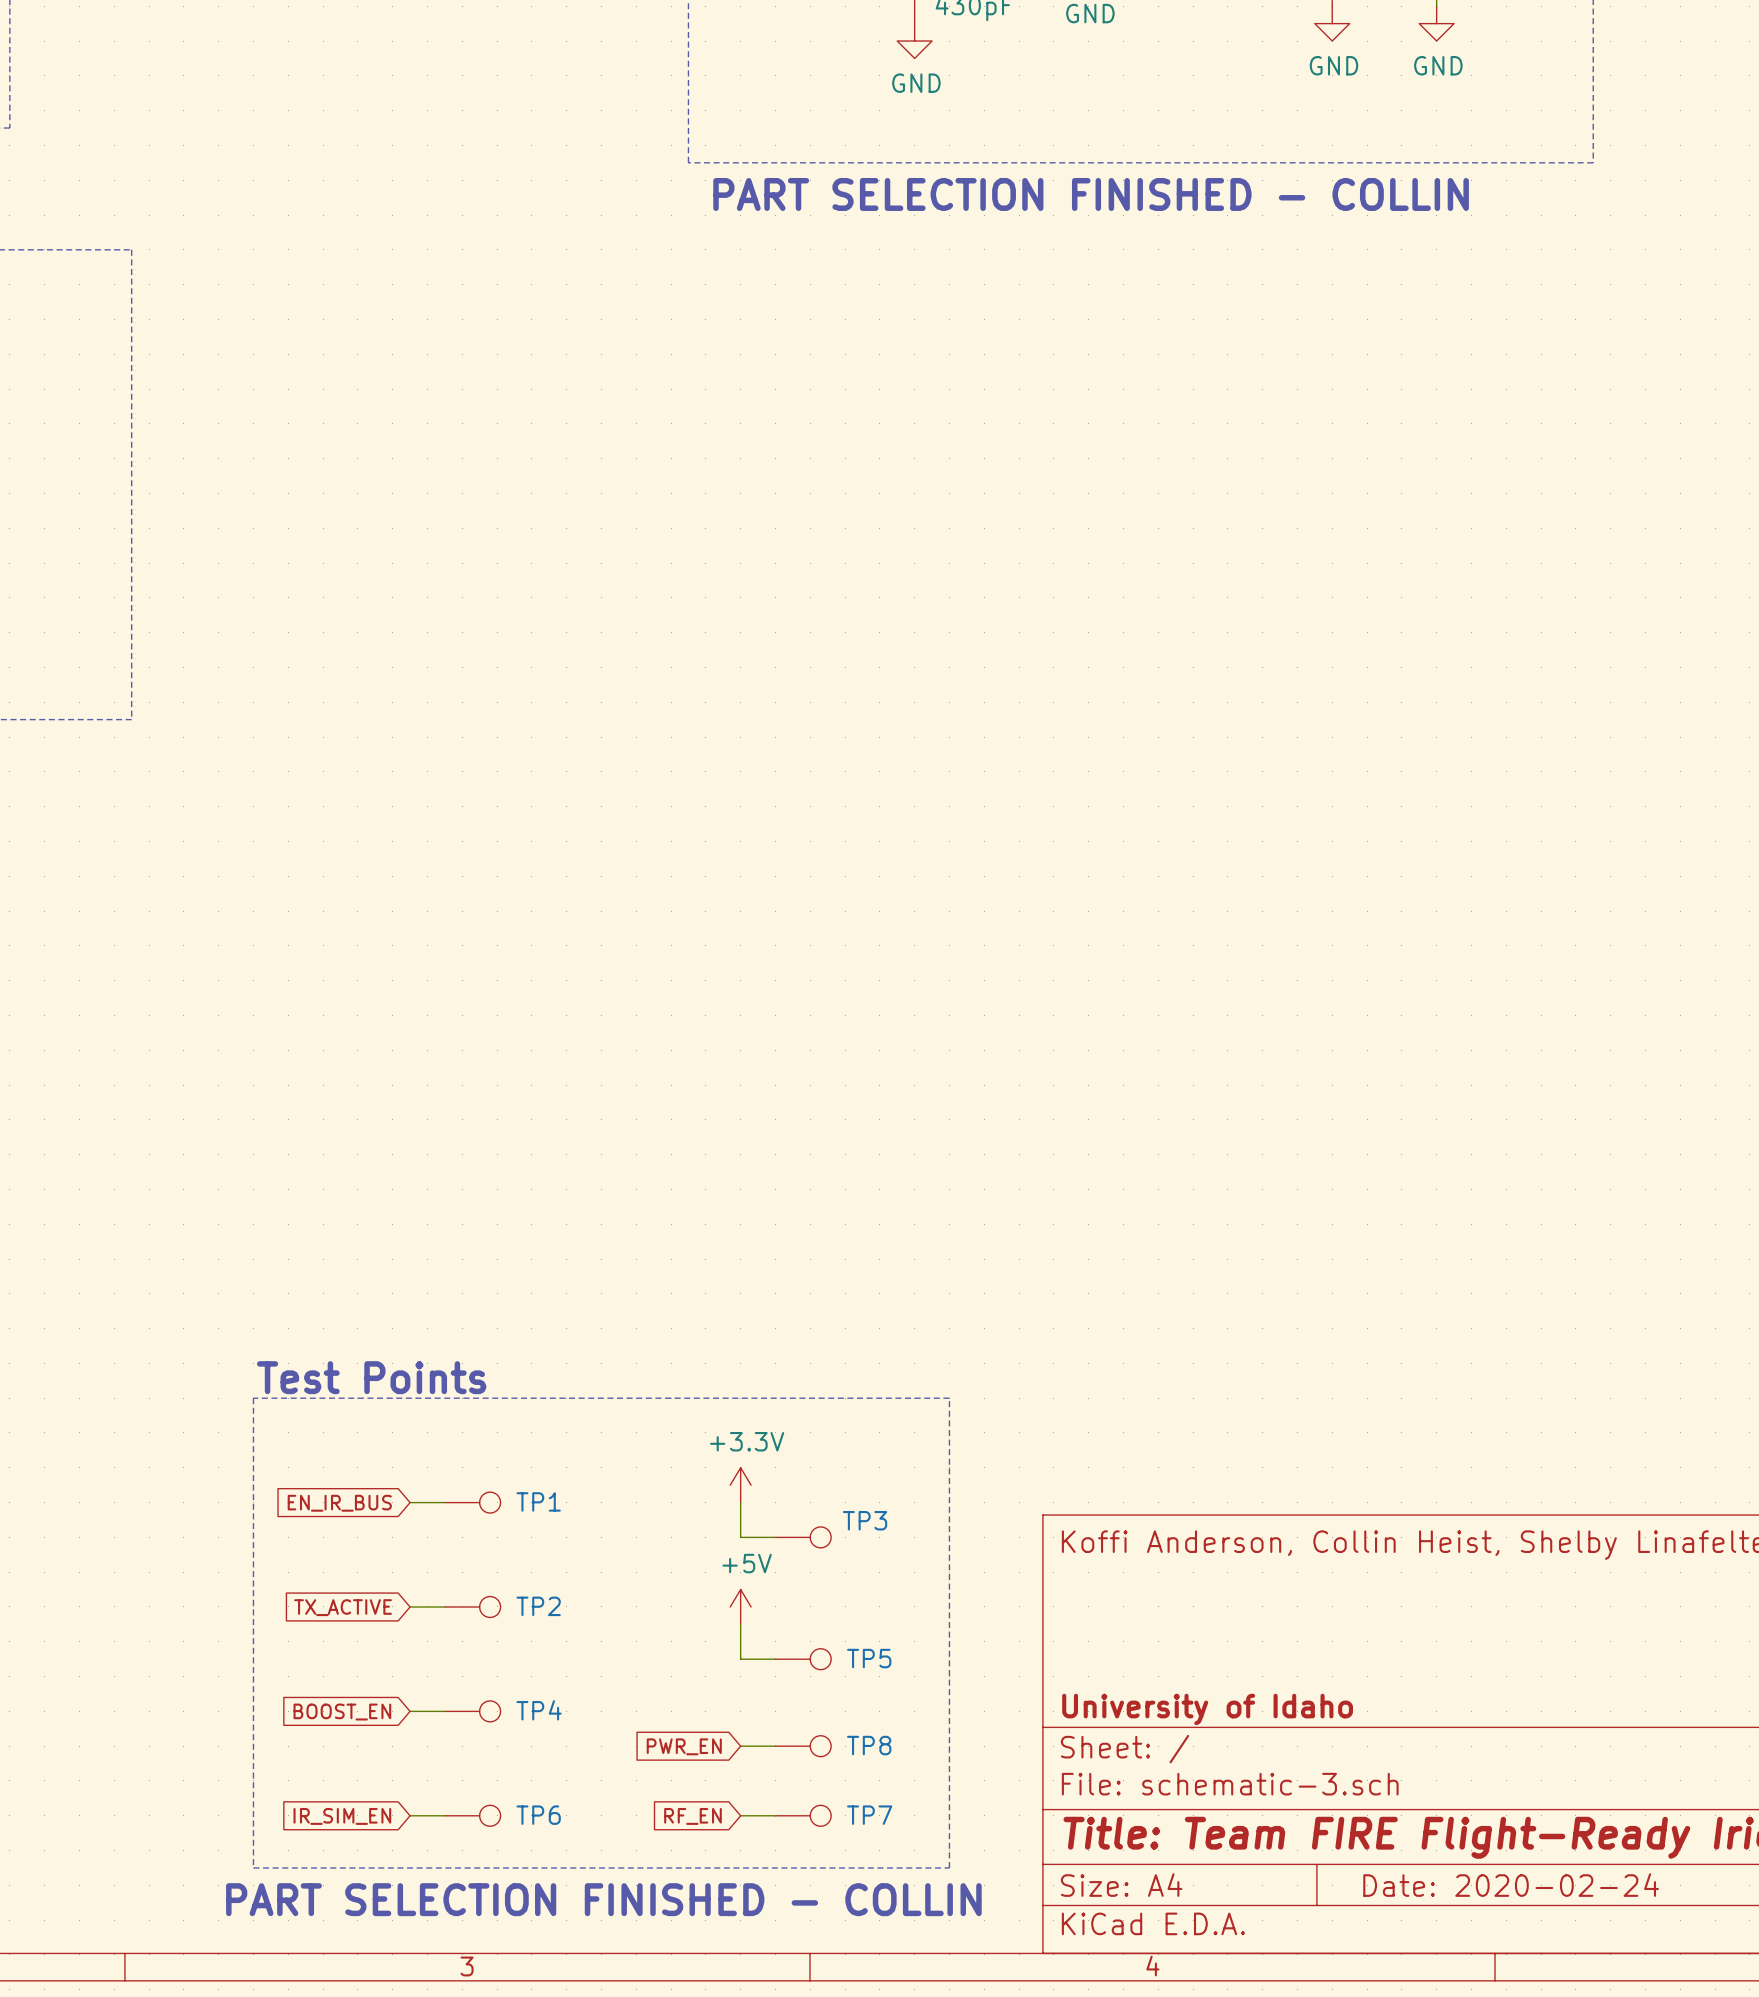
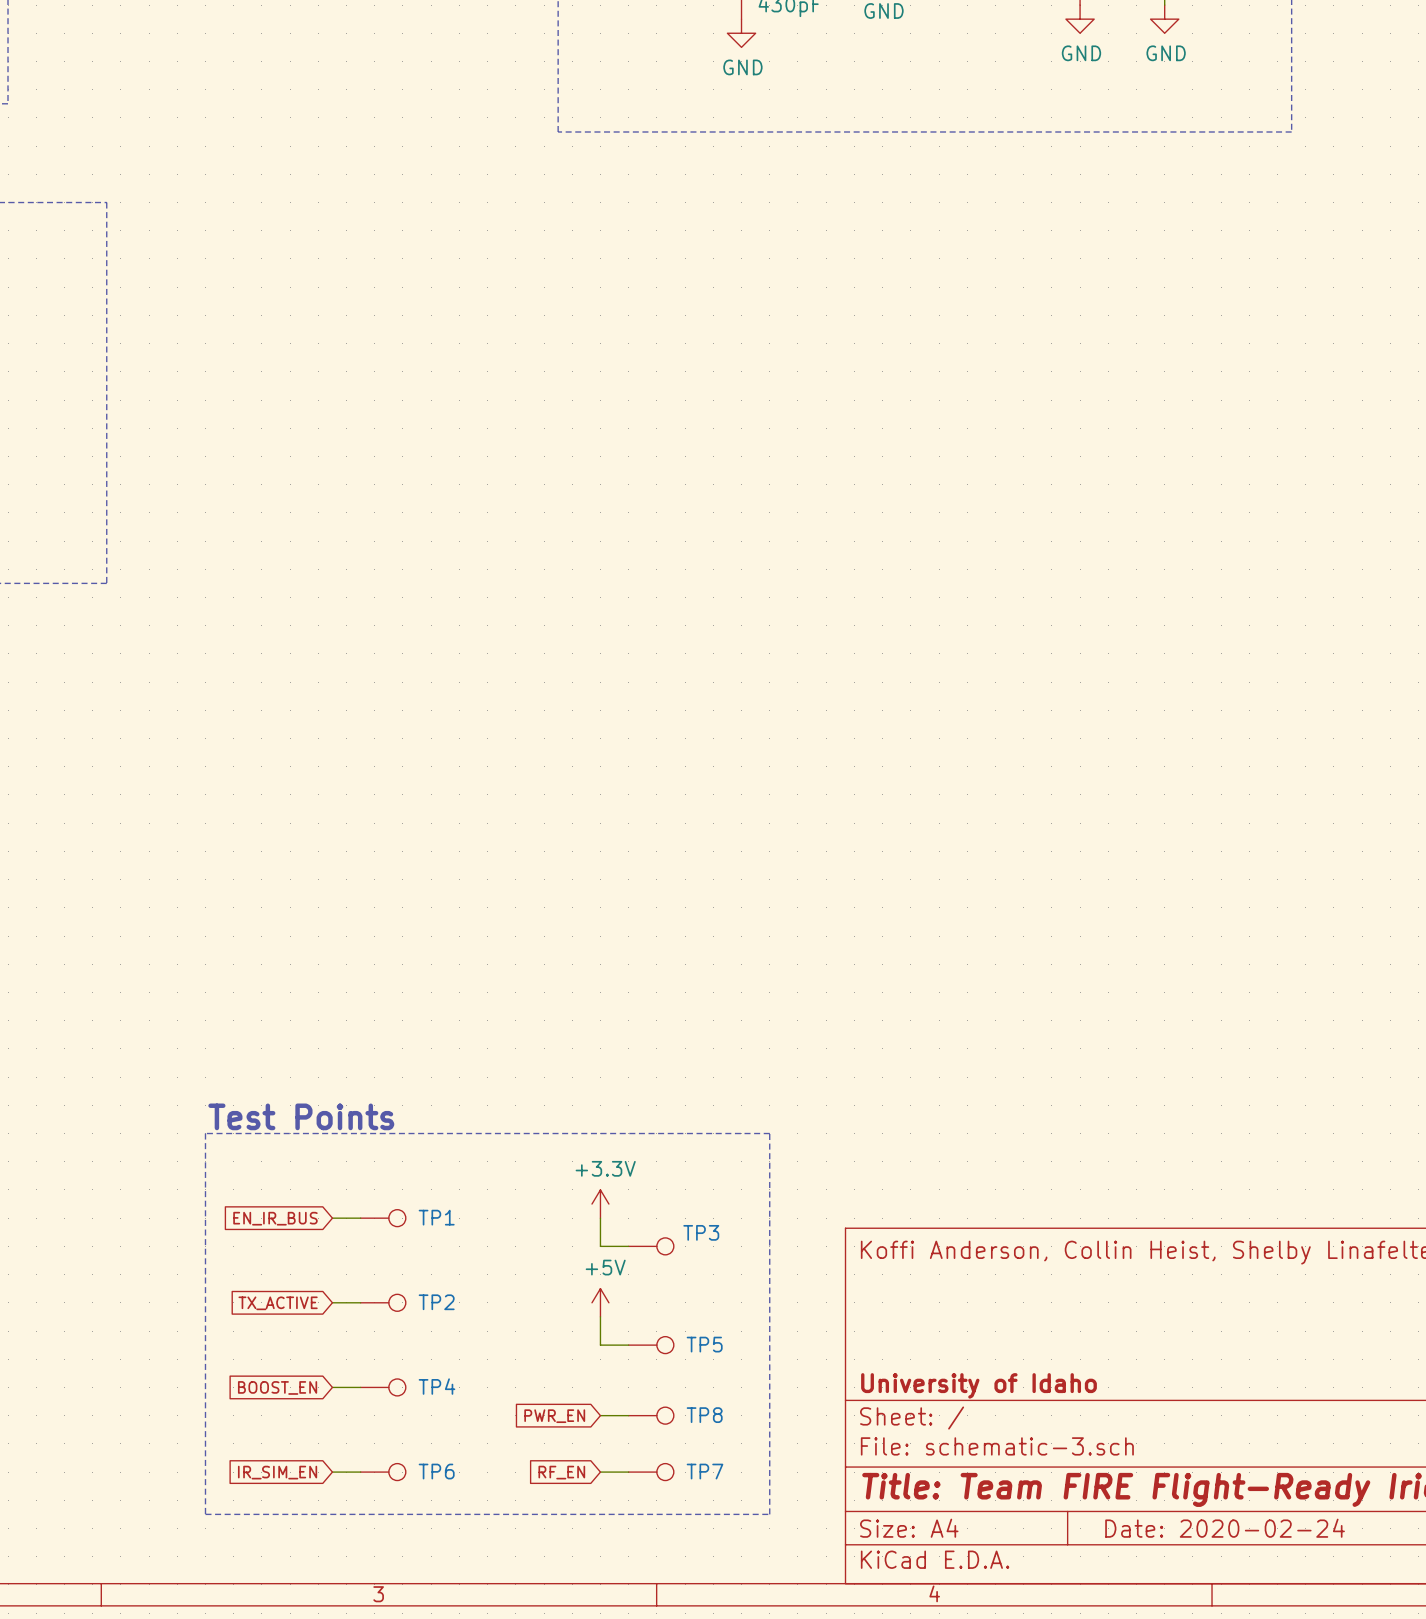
text: PART SELECTION FINISHED - COLLIN (1091, 194) -> none
text: PART SELECTION FINISHED - COLLIN (603, 1899) -> none

